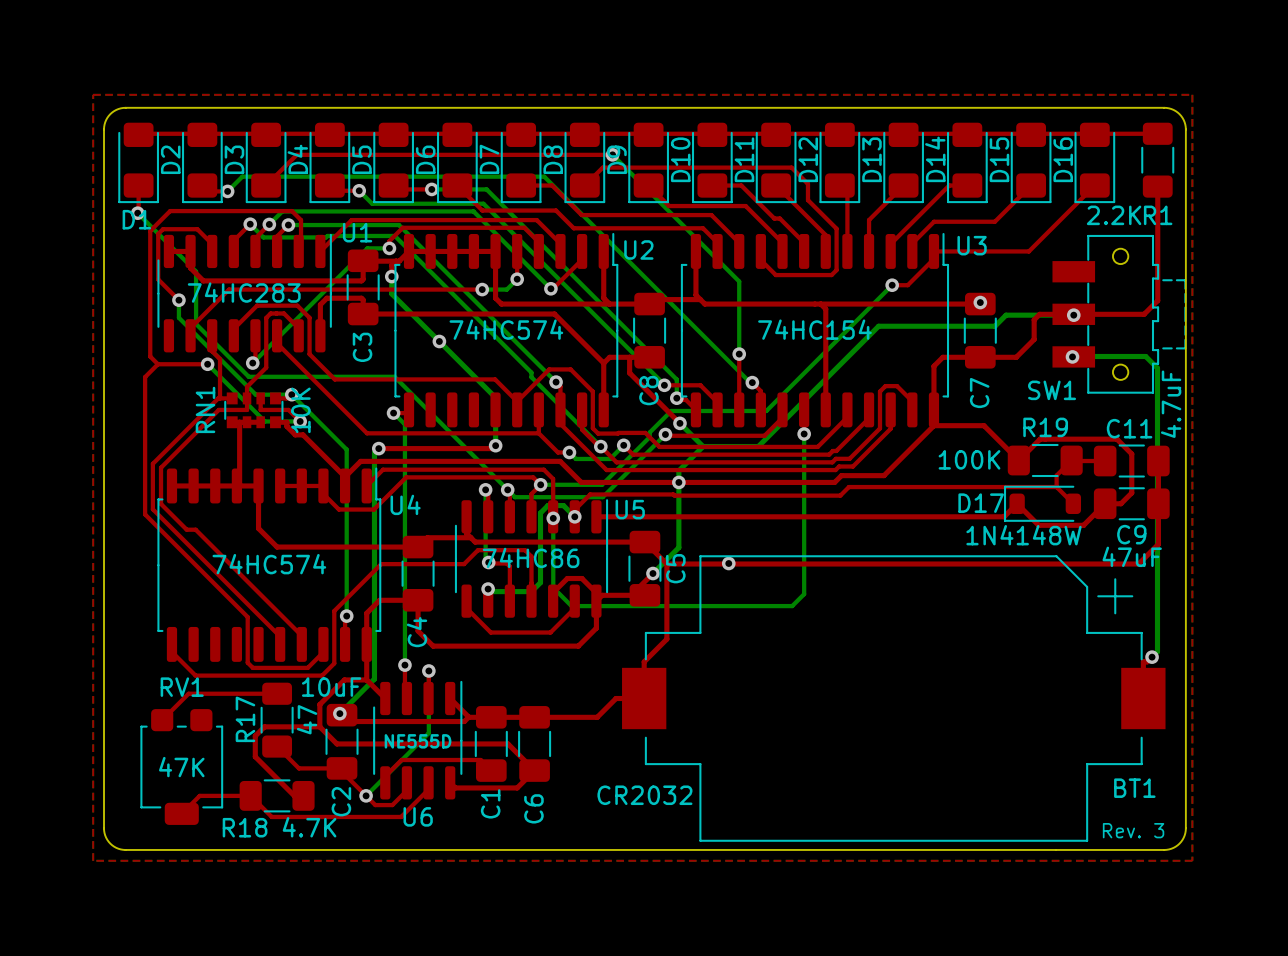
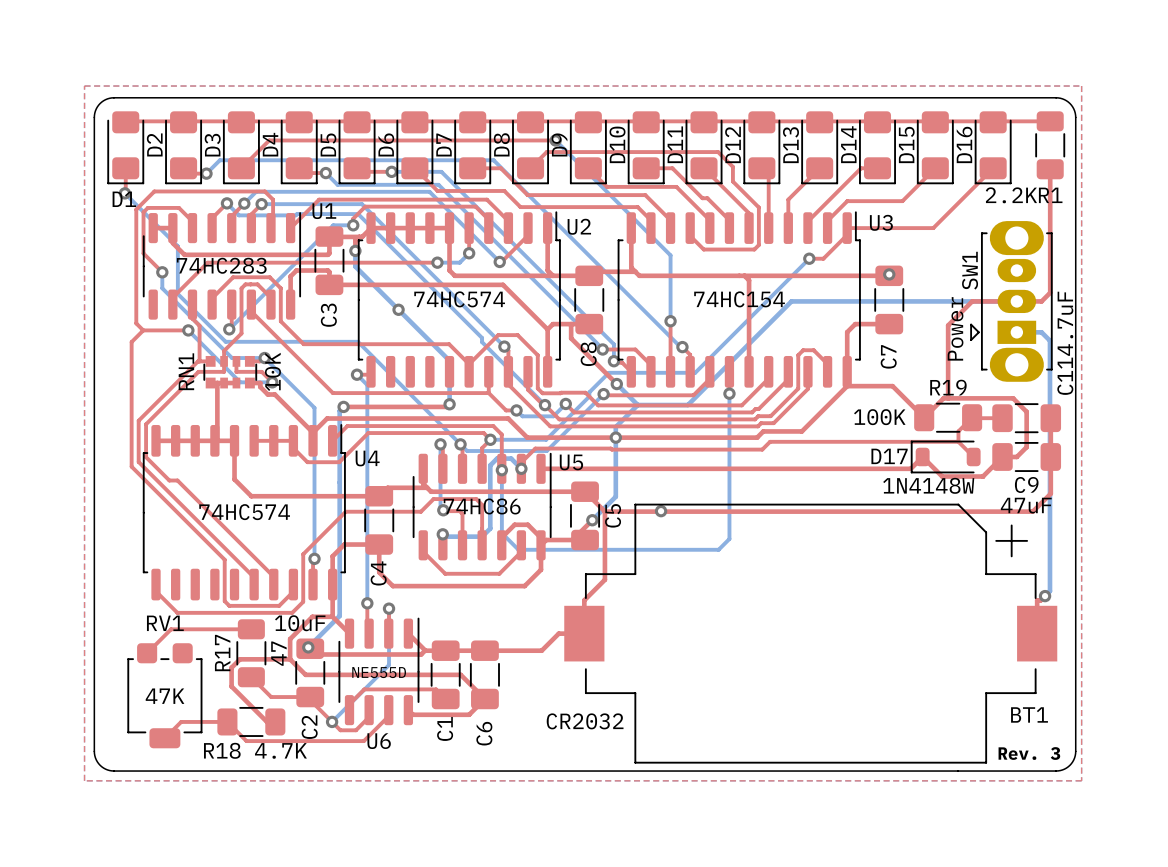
SW1 footprint: [1052, 234, 1187, 394] -> [970, 221, 1053, 382]
top track: (1157, 300) (1144, 314) (1039, 314) (1034, 319) (1034, 339) (1016, 357) (980, 357) -> (1050, 272) (1050, 292) (1041, 301) (972, 301) (948, 325) (948, 398)
bottom track: (1073, 315) (1006, 315) (994, 326) (878, 326) (872, 332) -> (1016, 301) (791, 301)
via: (1073, 315) -> none
bottom track: (1072, 356) (1145, 356) (1157, 368) (1157, 375) -> (1016, 332) (1041, 332) (1049, 340)
via: (1072, 356) -> none
SW1 value: none -> Power (955, 328)
SW1 name position: SW1 (1052, 390) -> SW1 (970, 270)
C11 value position: 4.7uF (1171, 404) -> 4.7uF (1065, 323)
C11 name rotation: 0° (1129, 428) -> 90° counterclockwise (1065, 376)

